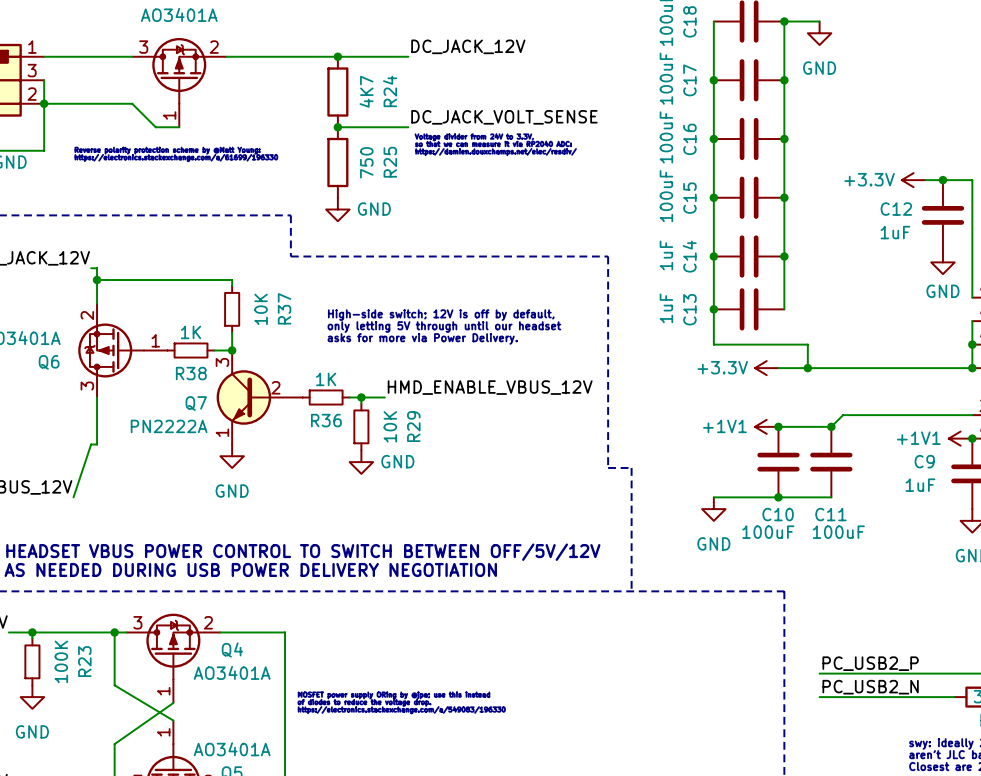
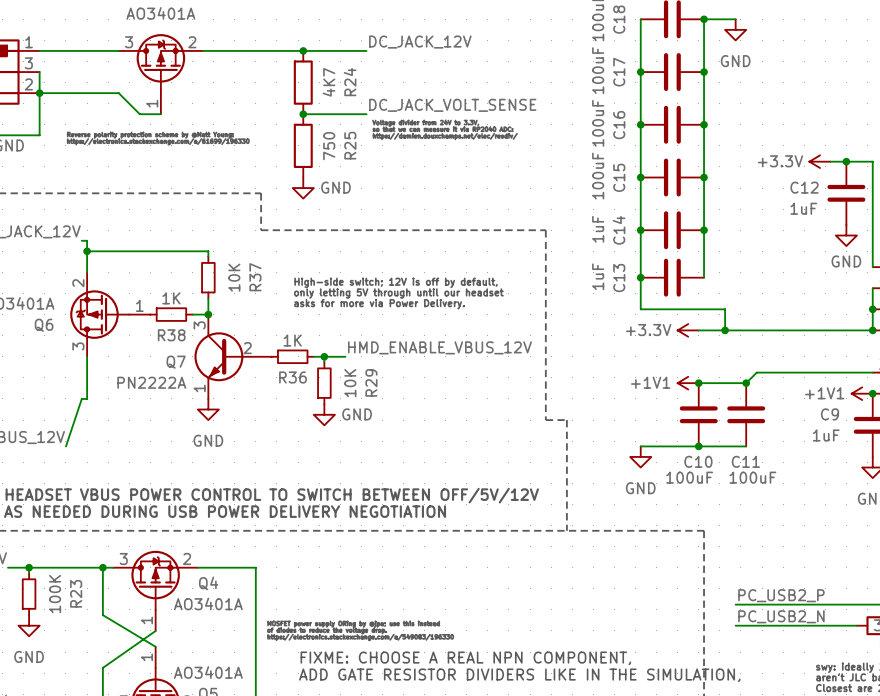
text: none -> FIXME: CHOOSE A REAL NPN COMPONENT, (465, 658)
text: none -> ADD GATE RESISTOR DIVIDERS LIKE IN THE SIMULATION, (519, 675)

